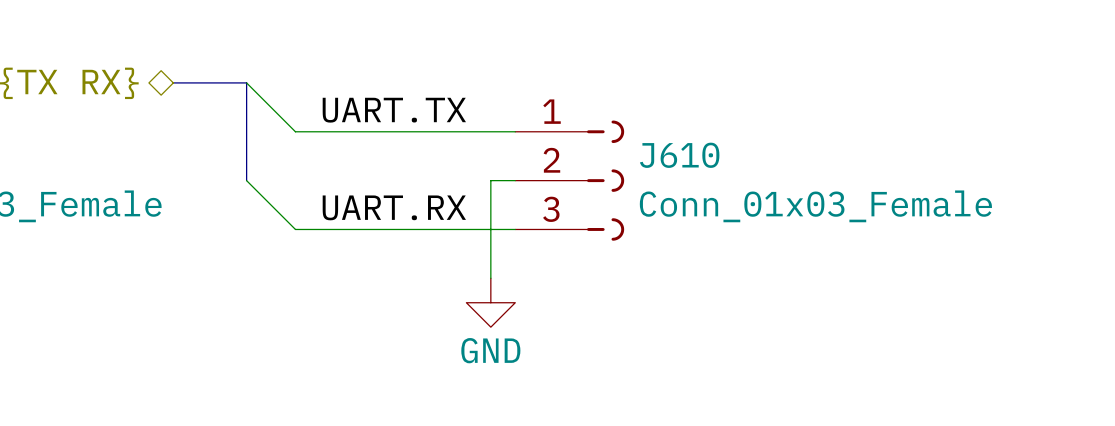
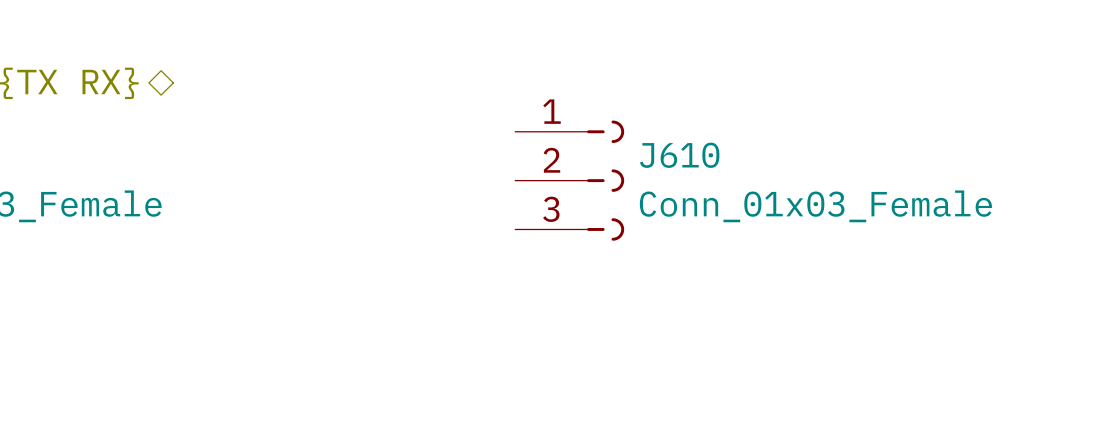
bus: (173, 82) (246, 82) (246, 180) -> none
wire: (246, 82) (295, 131) (515, 131) -> none
label: UART.TX (394, 110) -> none
wire: (246, 180) (295, 229) (515, 229) -> none
wire: (515, 180) (490, 180) (490, 278) -> none
label: UART.RX (394, 207) -> none
power symbol: GND (490, 302) -> none

